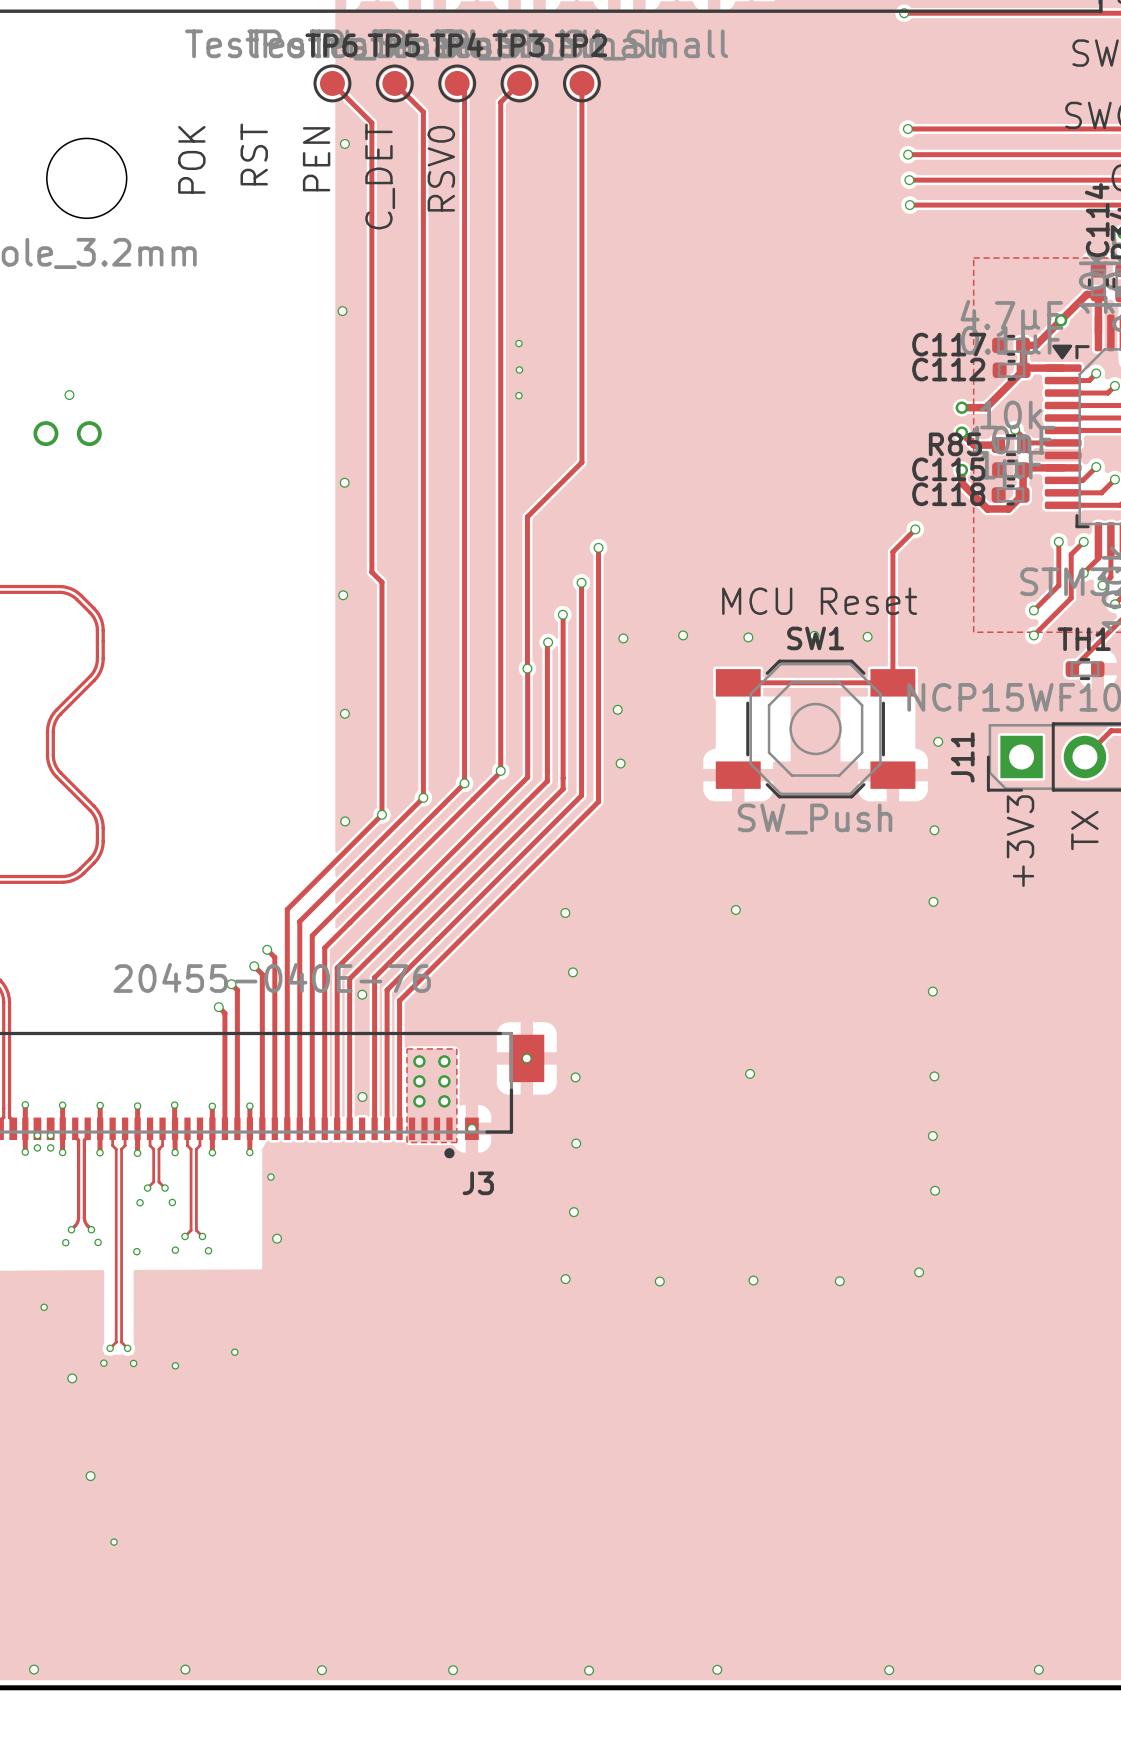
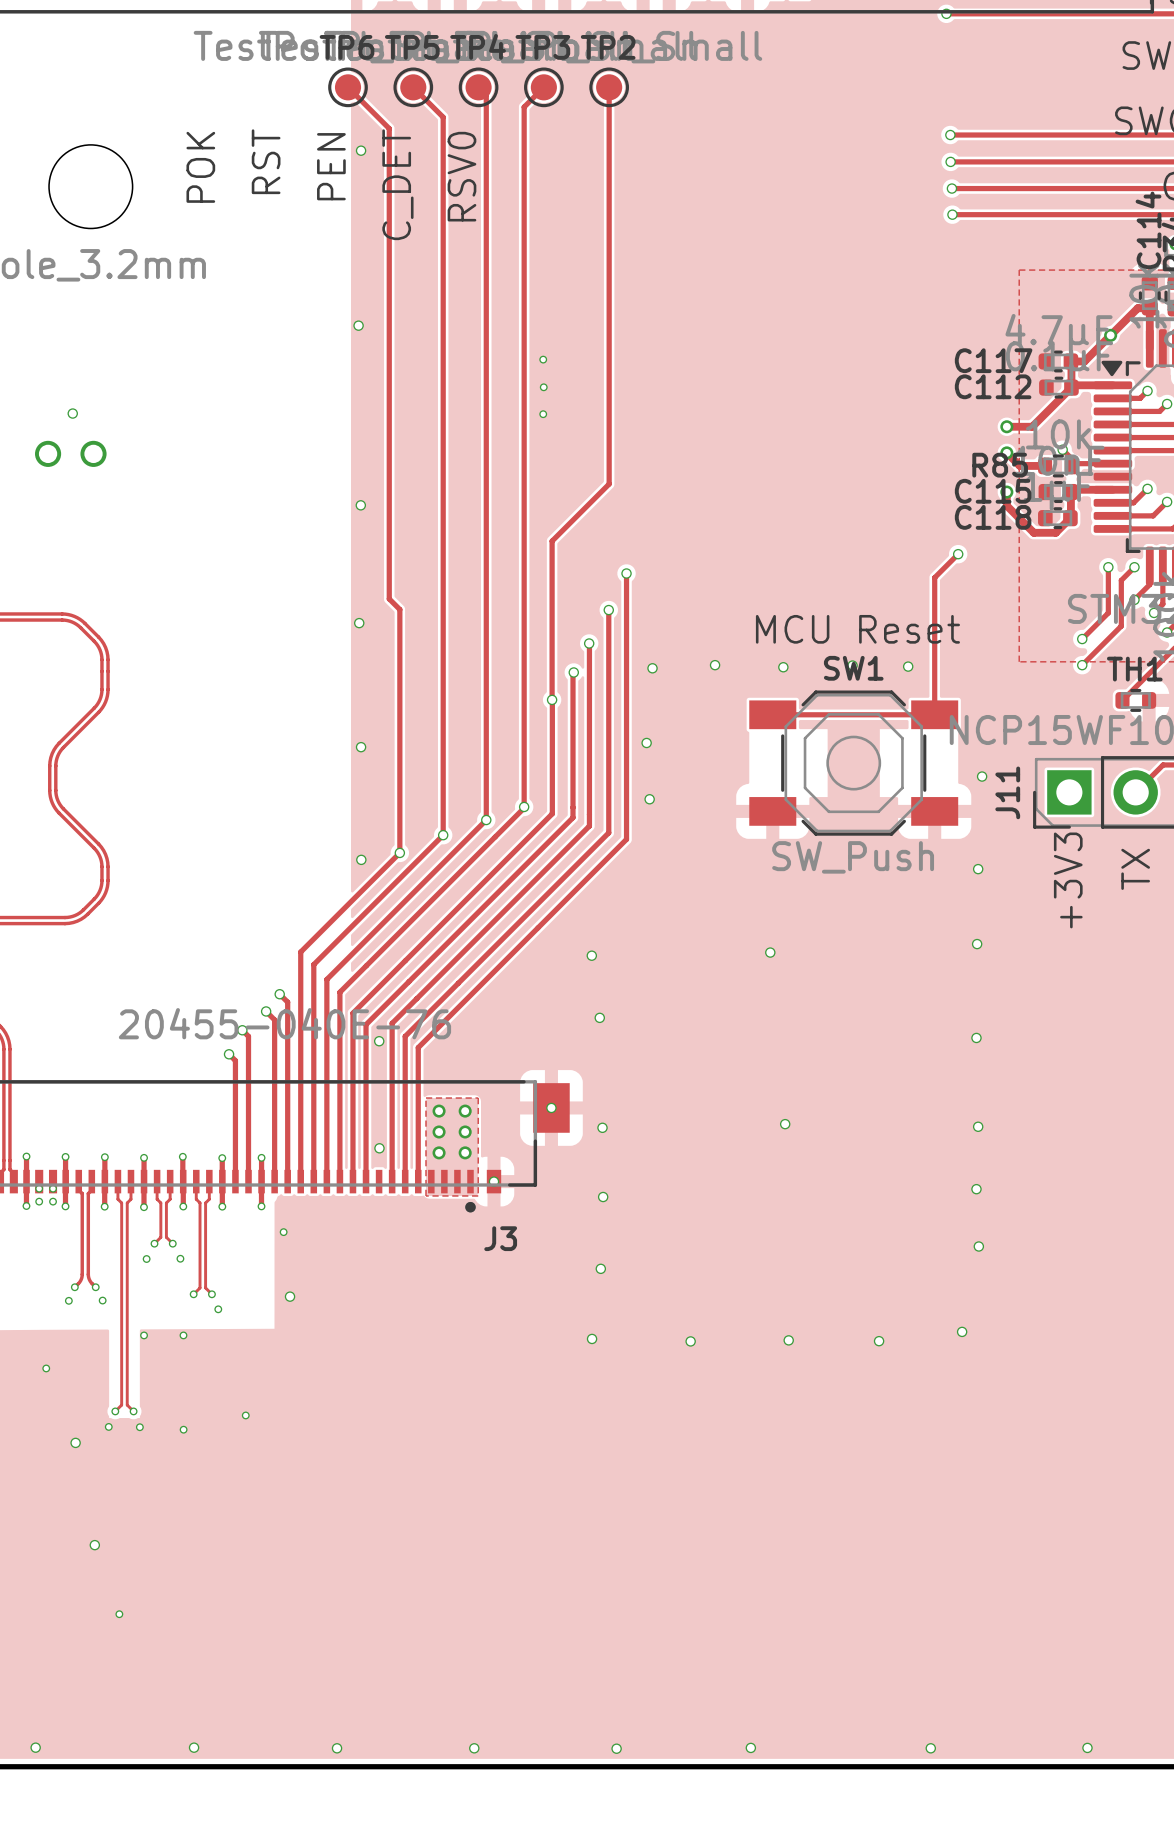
via: (175, 1250) -> none
via: (136, 1251) -> none
via: none -> (144, 1335)
via: none -> (183, 1335)

